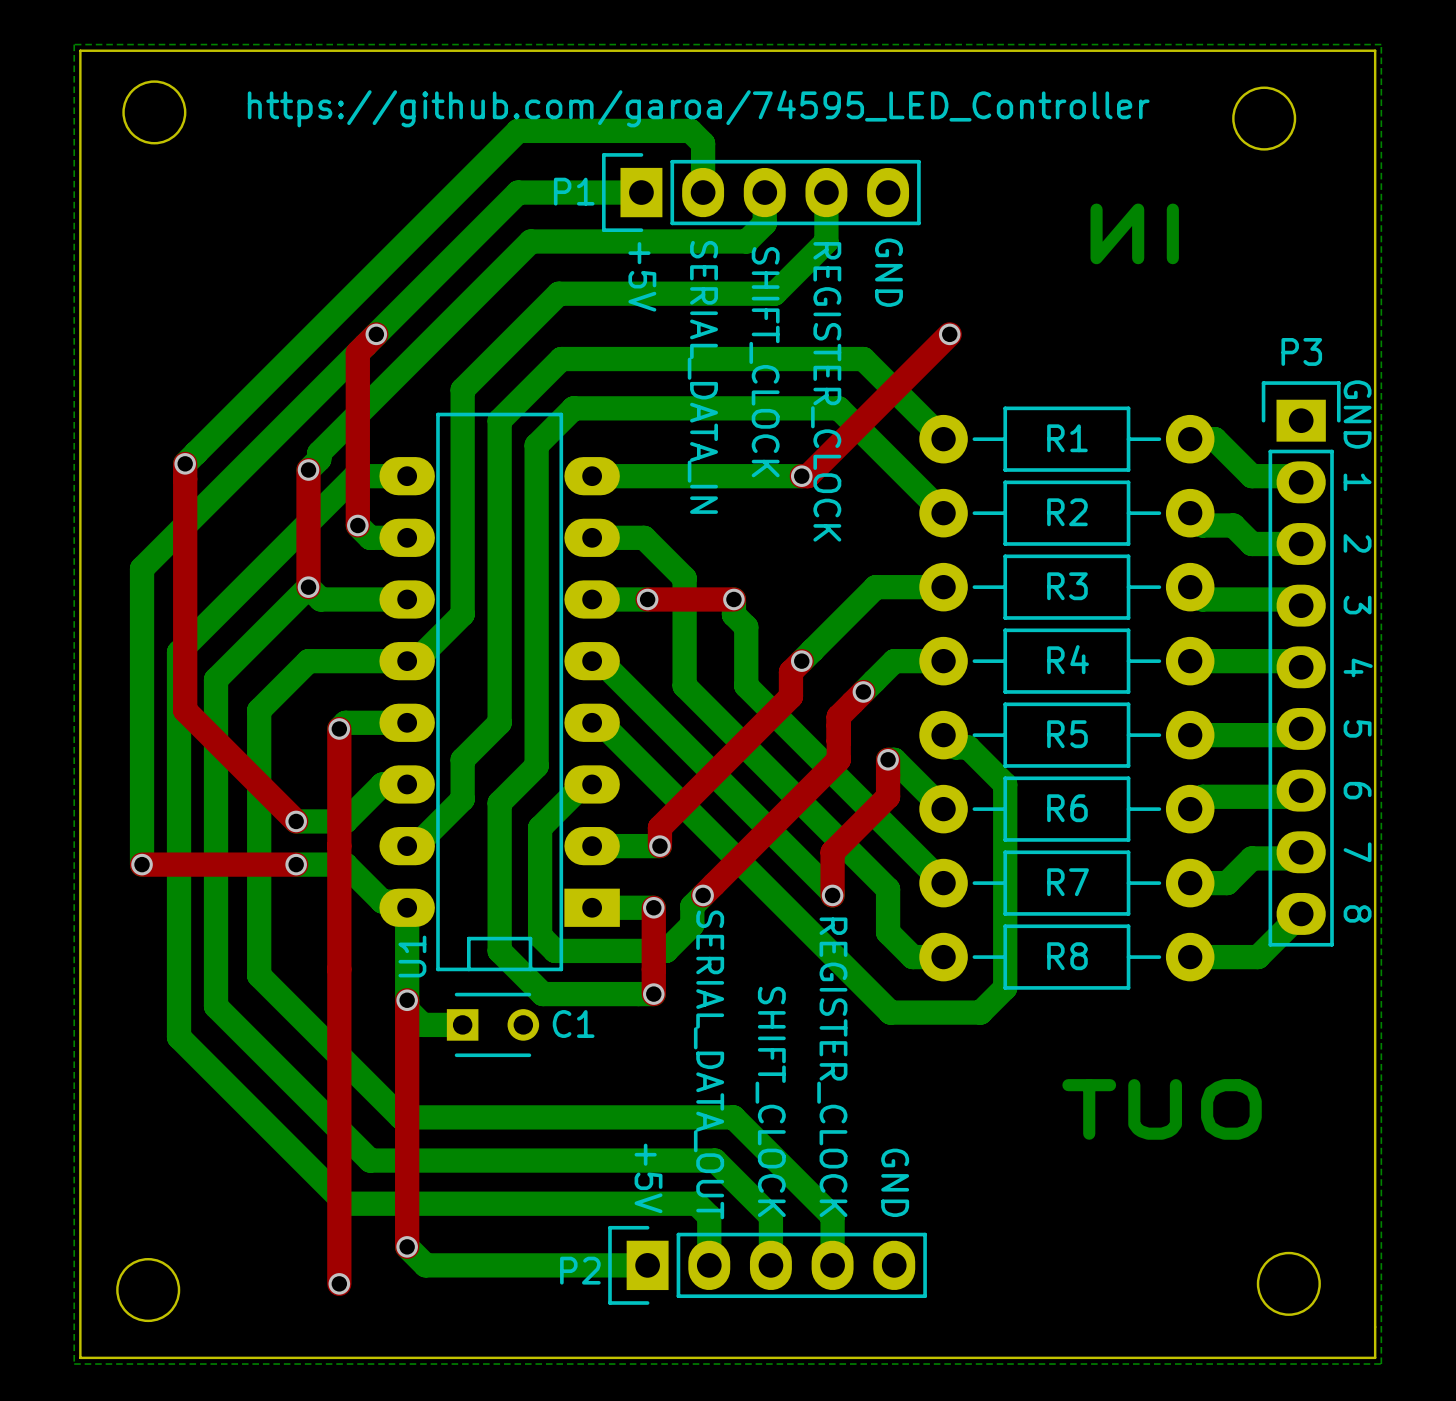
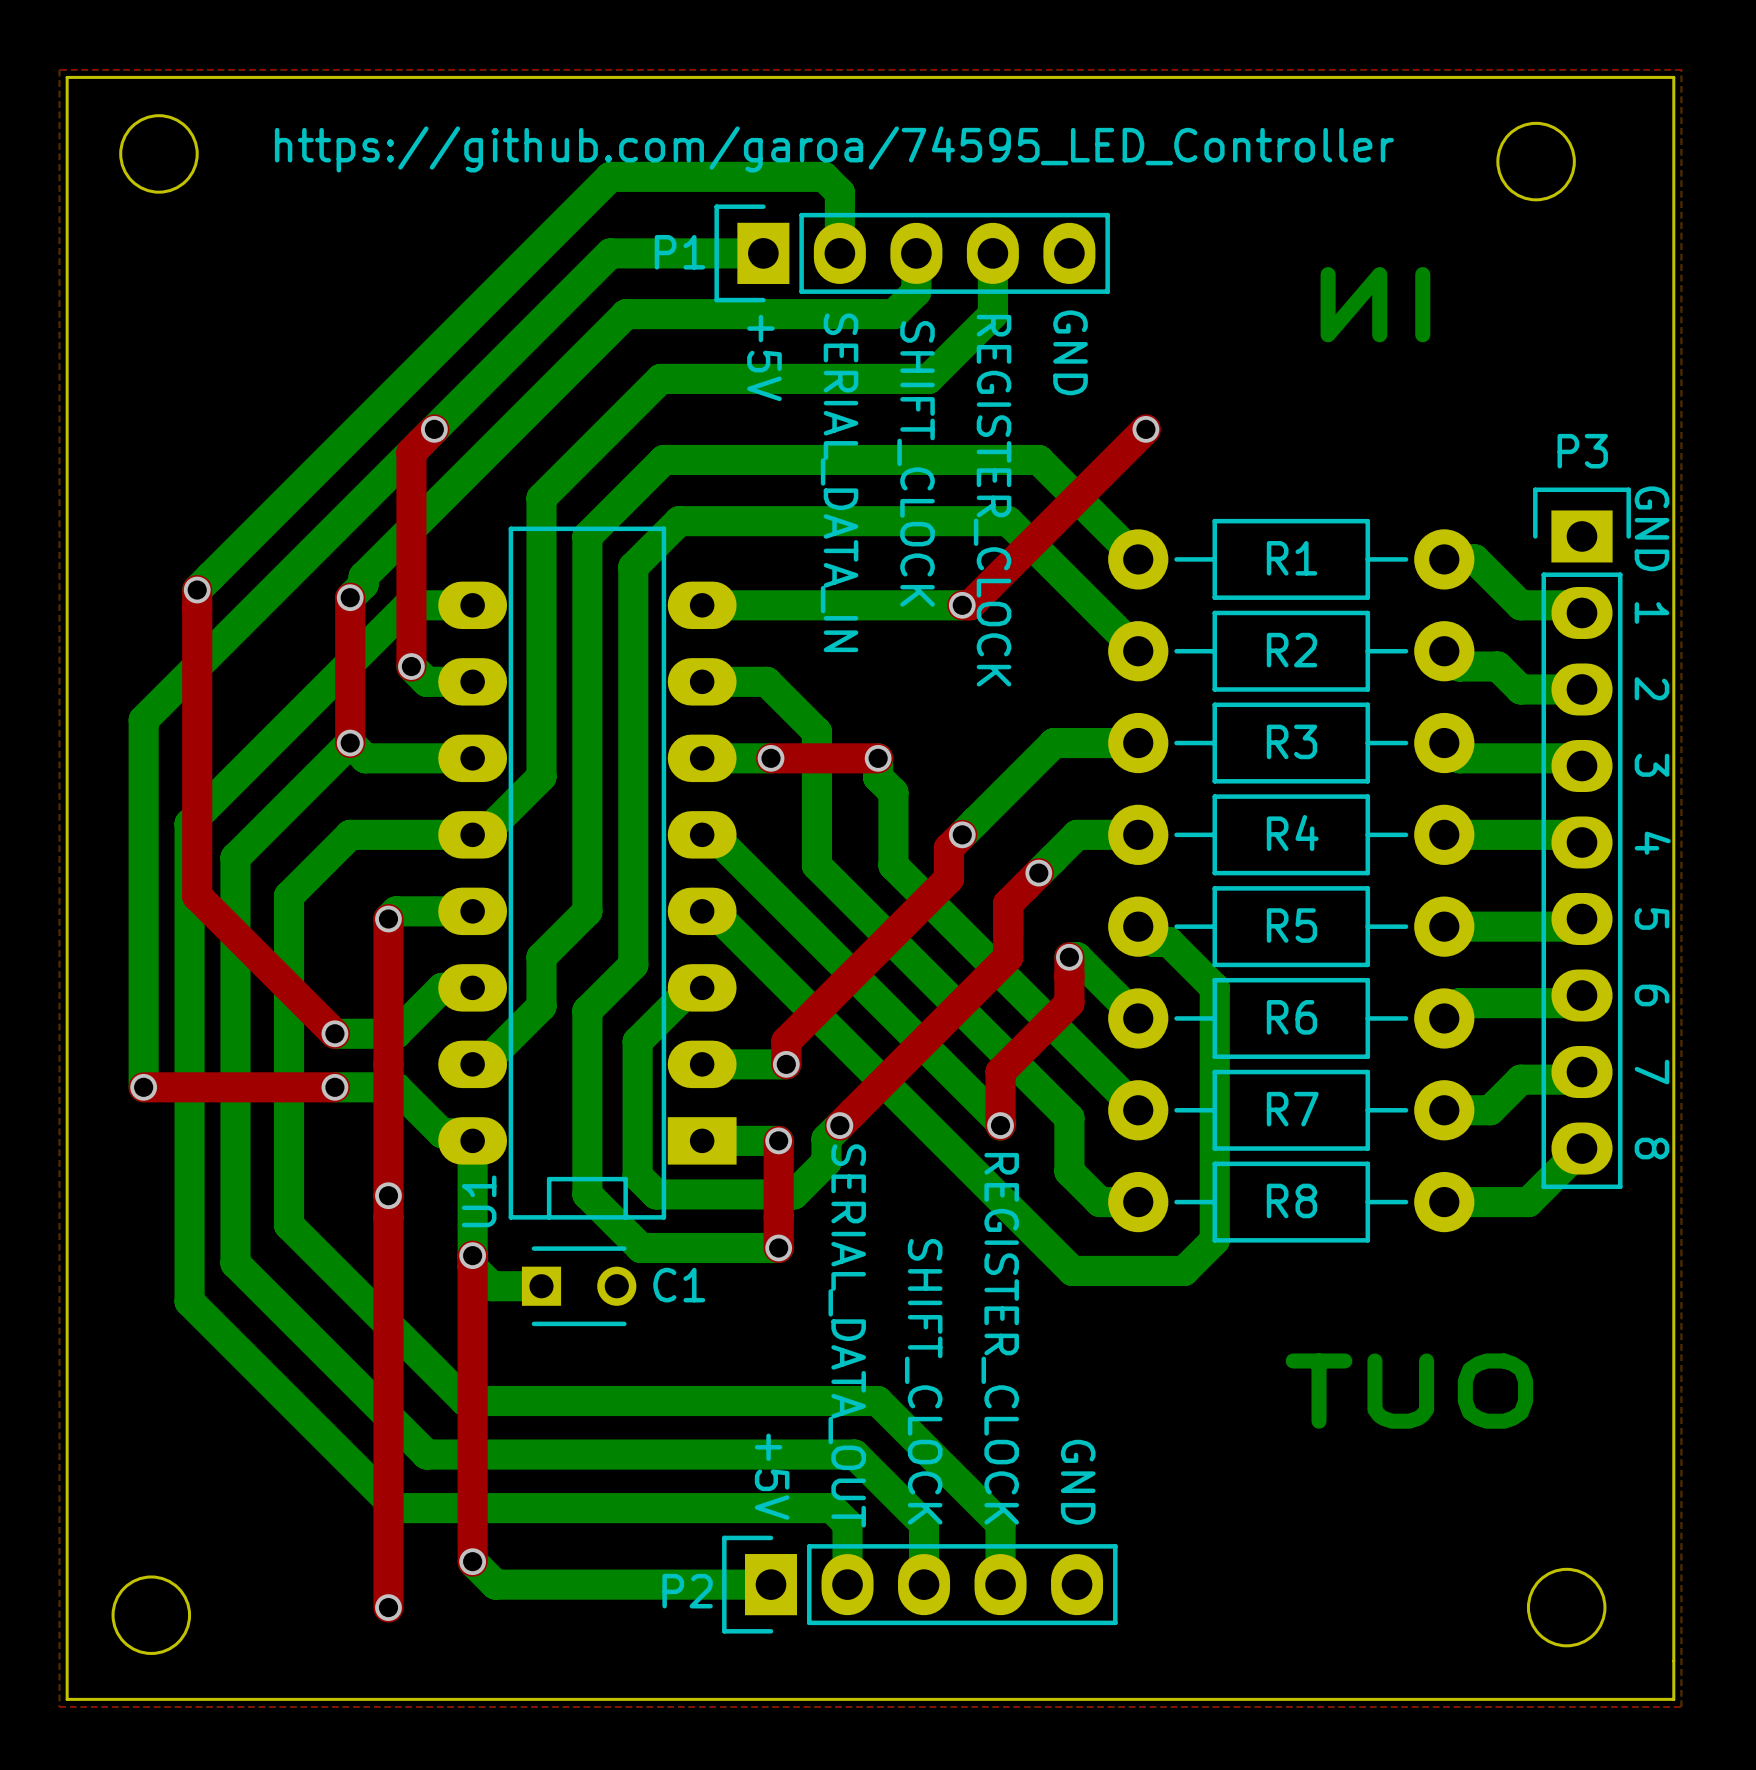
top zone outline: none -> (59, 69) (59, 1707) (1681, 1707) (1681, 69) (59, 69)
via: none -> (388, 1195)

